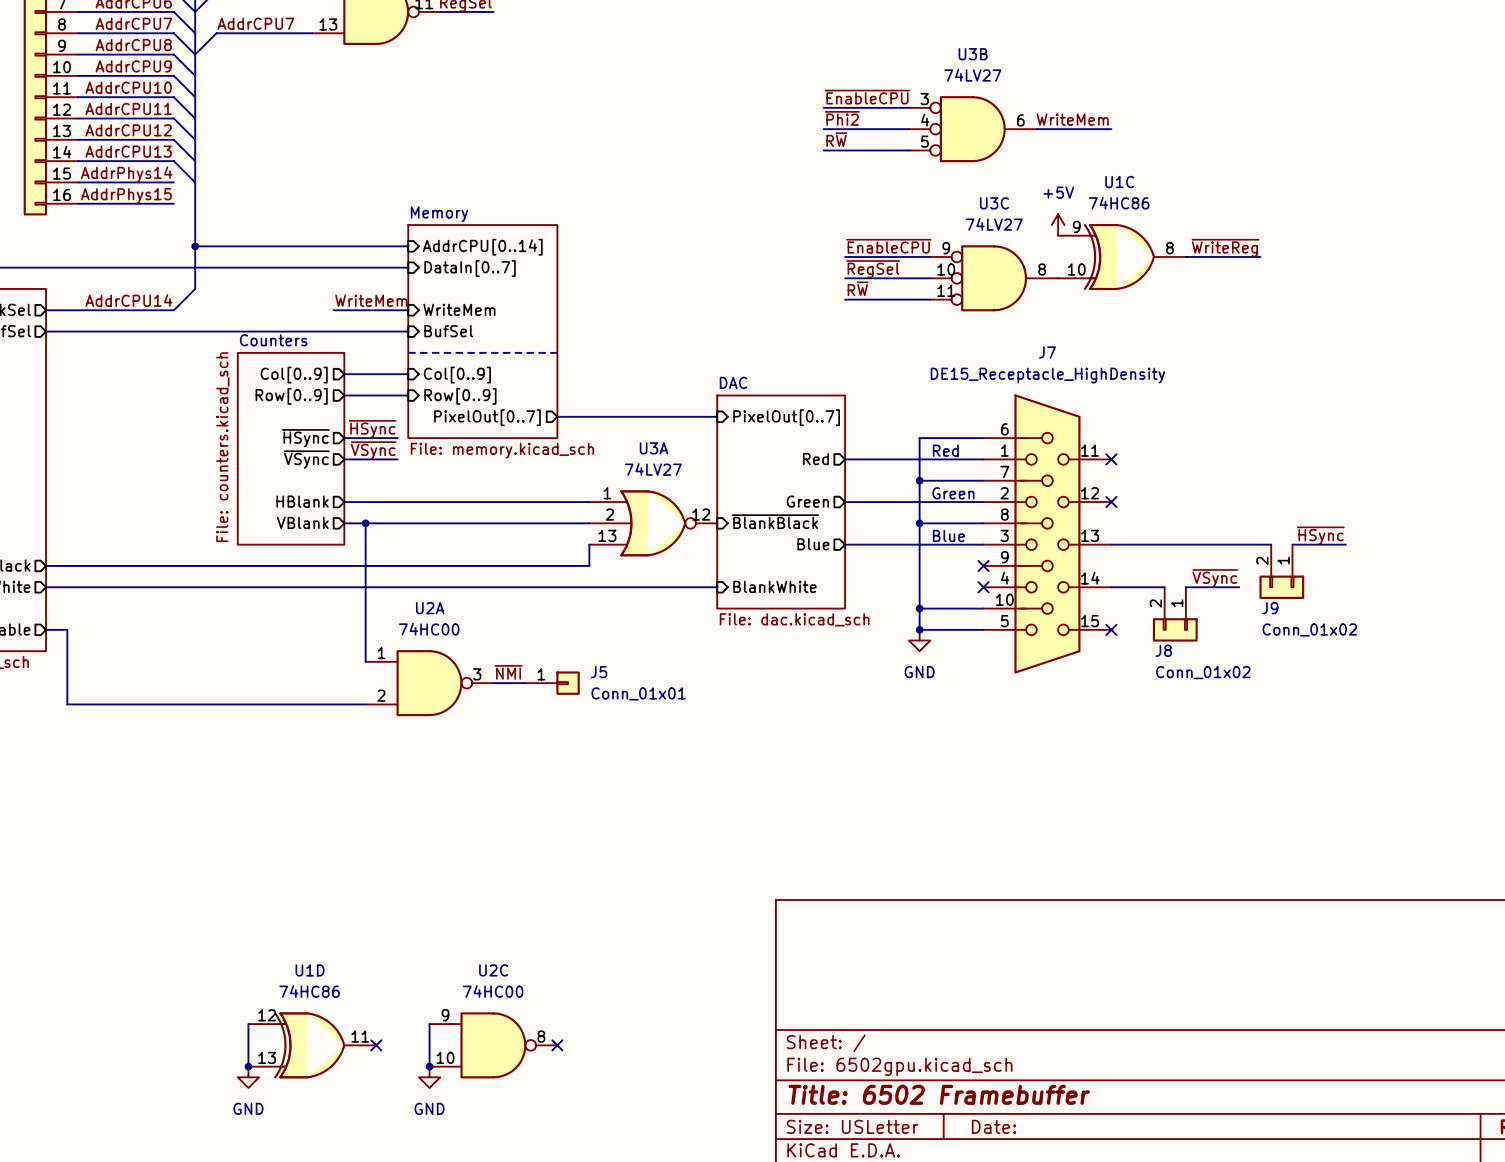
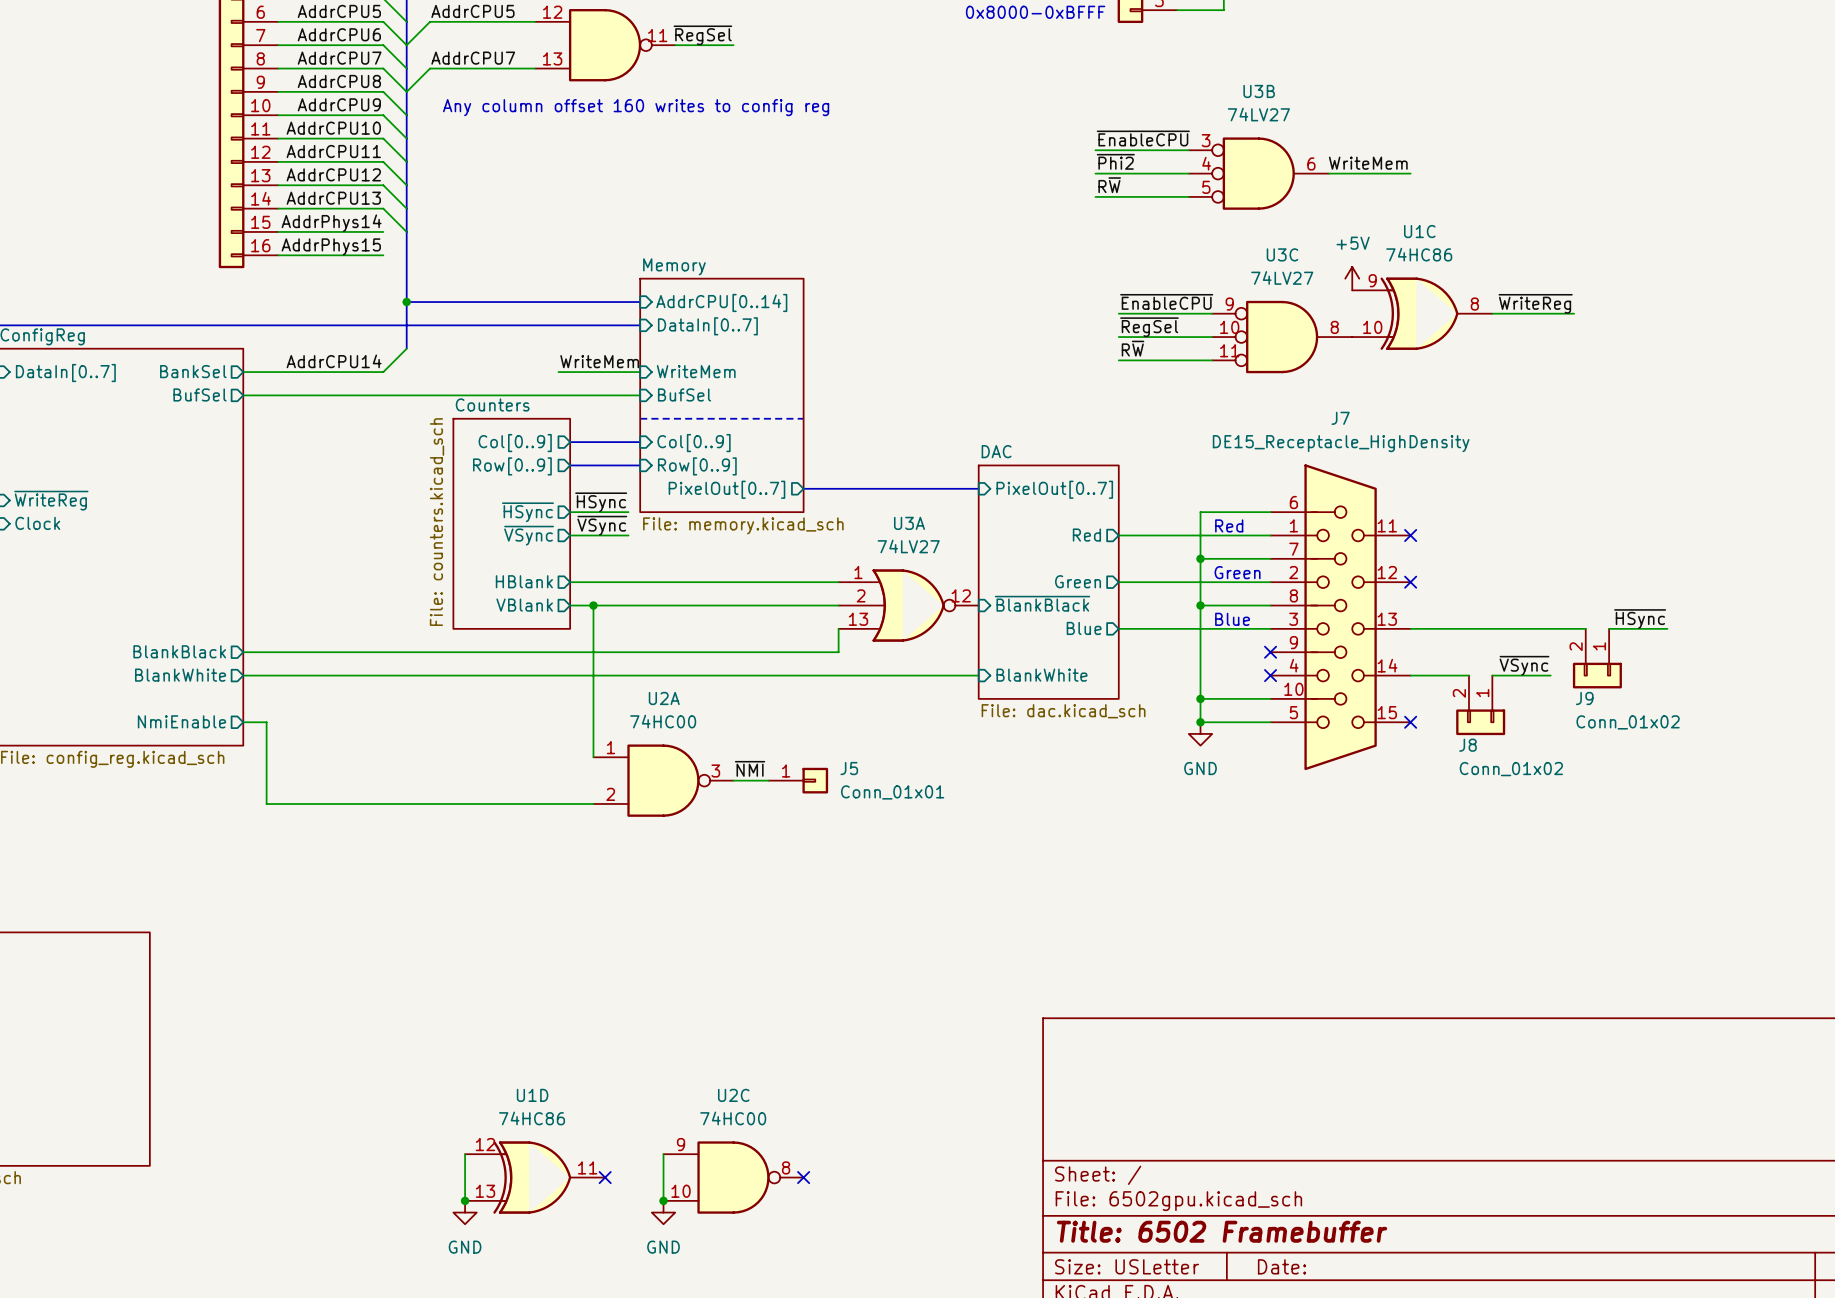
text: none -> Any column offset 160 writes to config reg (636, 107)

